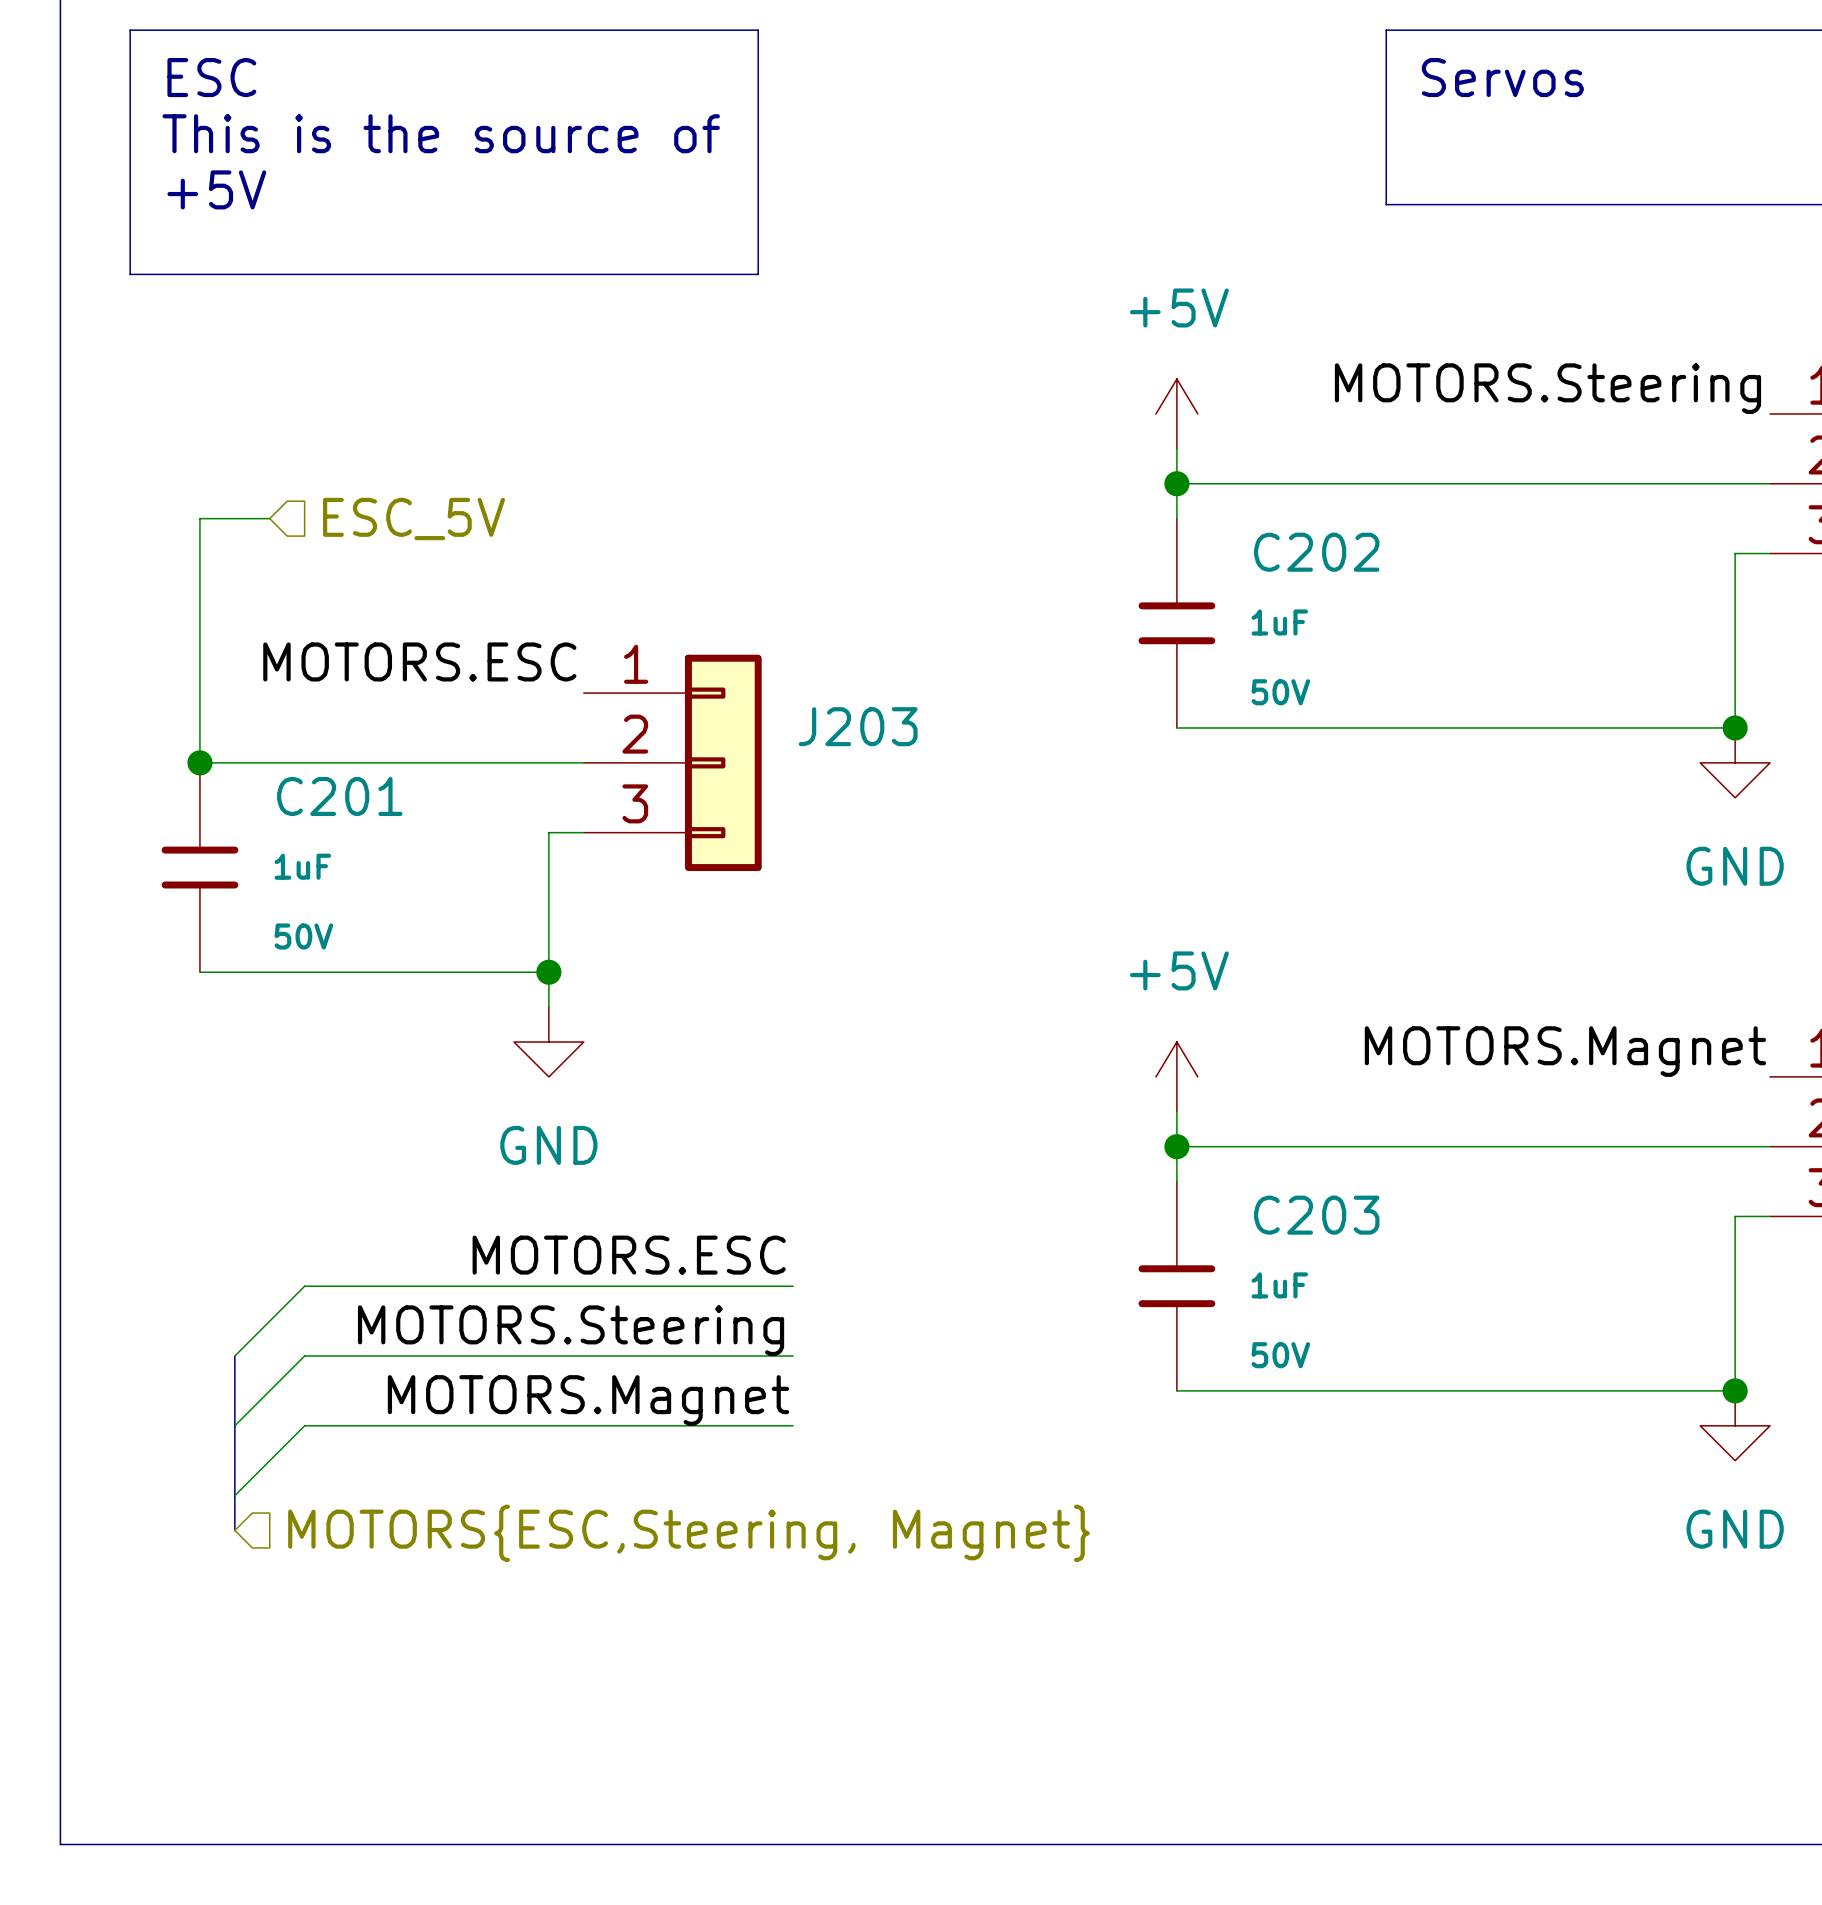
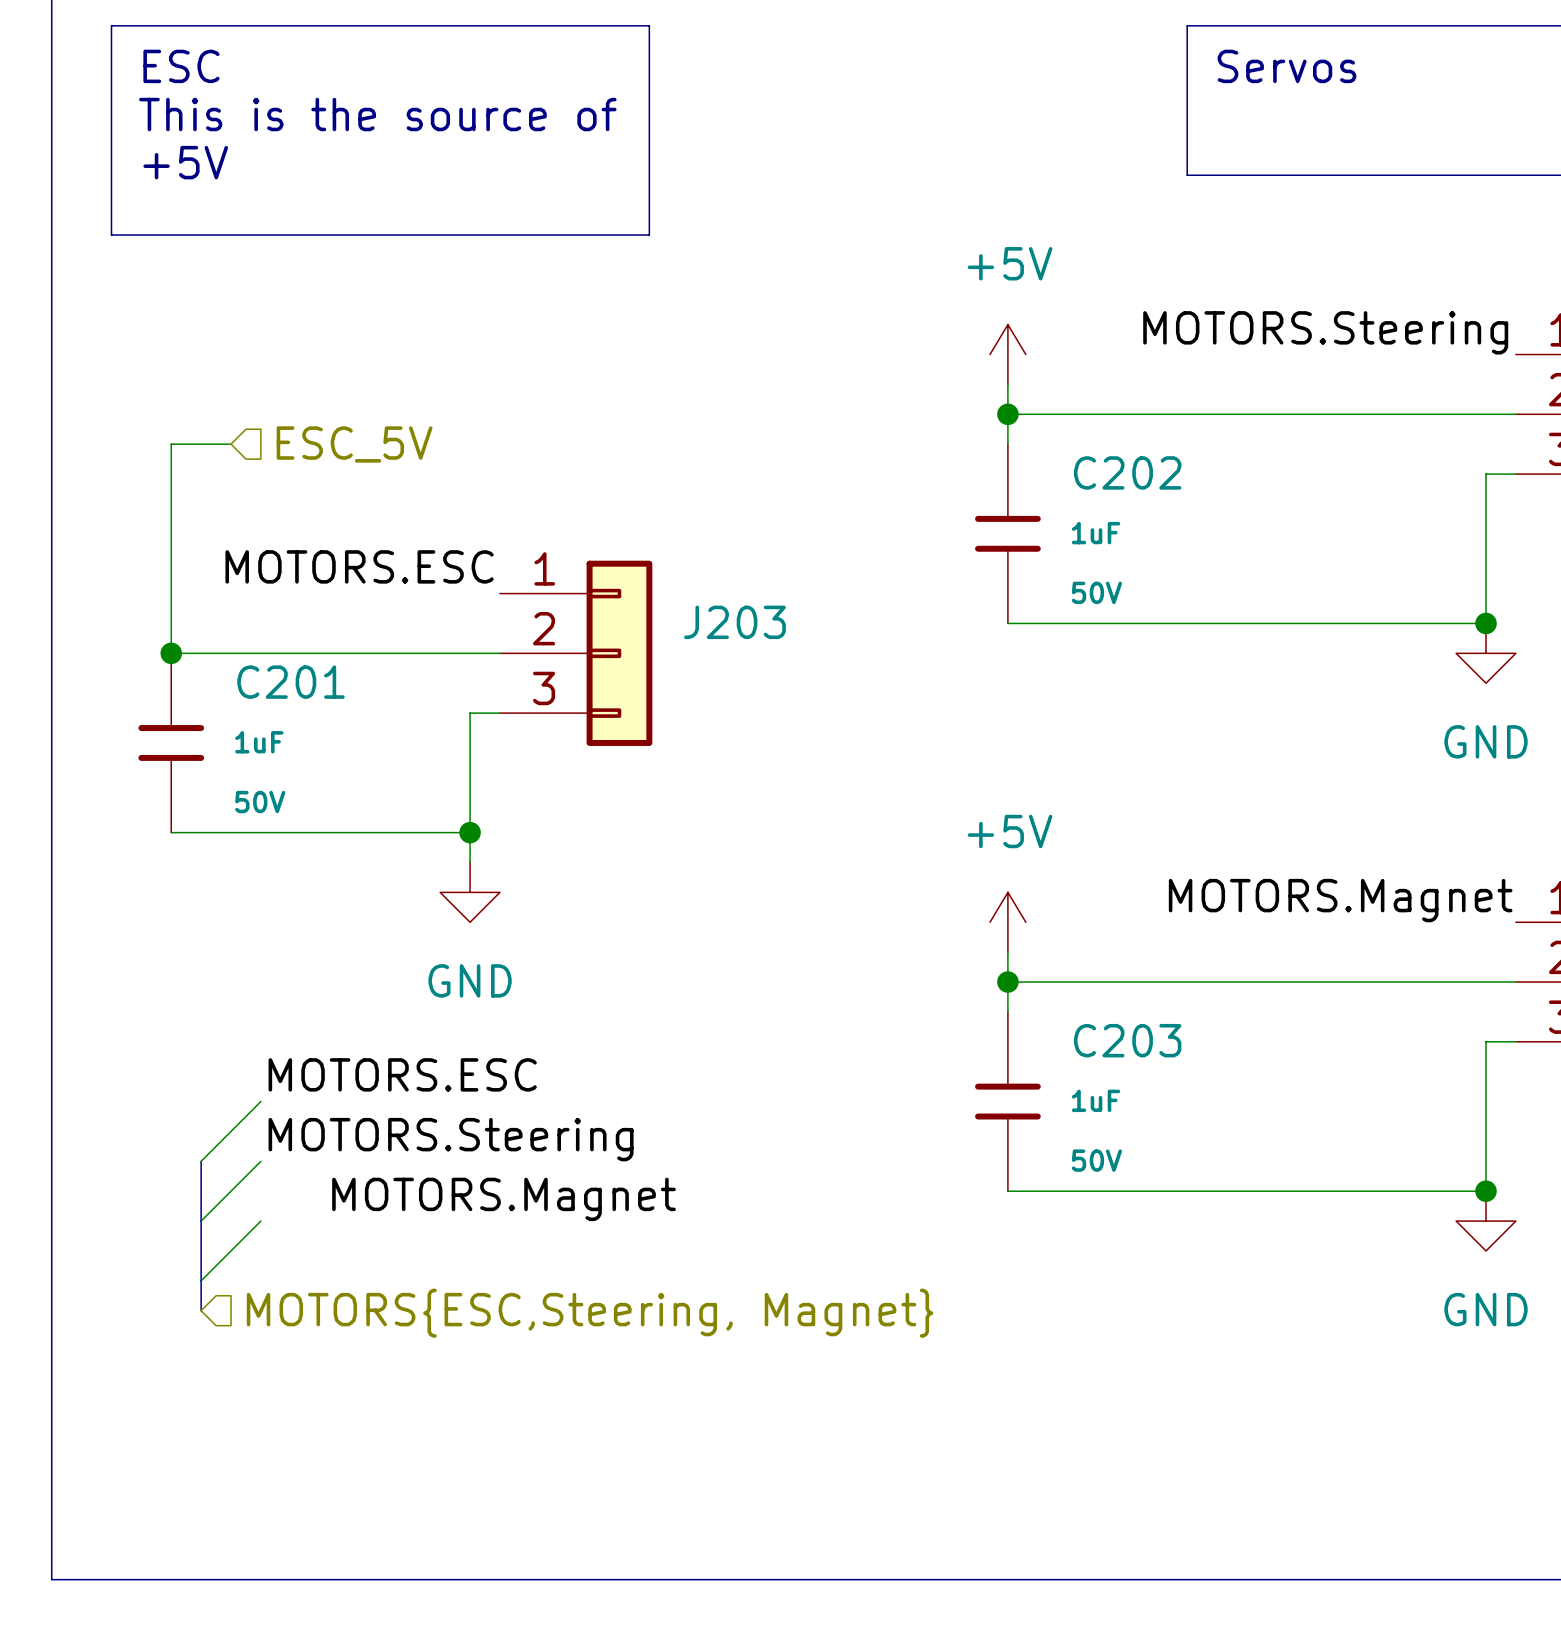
label position: MOTORS.ESC (629, 1255) -> MOTORS.ESC (402, 1074)
wire: (304, 1286) (793, 1286) -> none
label position: MOTORS.Steering (571, 1330) -> MOTORS.Steering (451, 1139)
wire: (304, 1356) (793, 1356) -> none
wire: (304, 1425) (793, 1425) -> none

